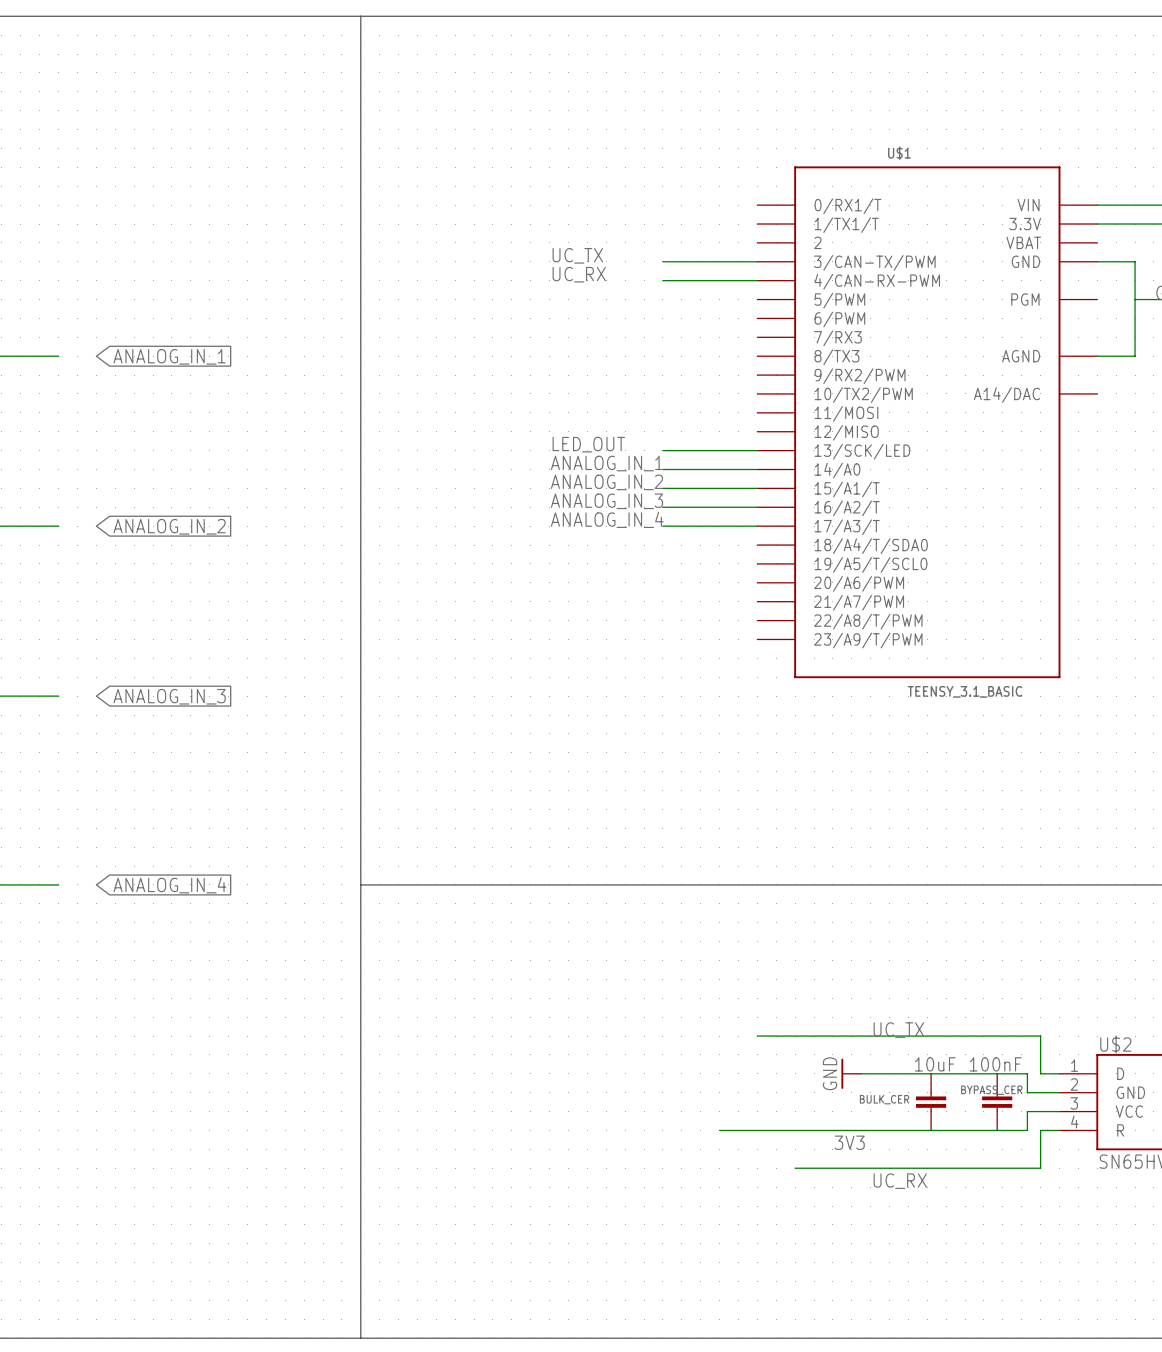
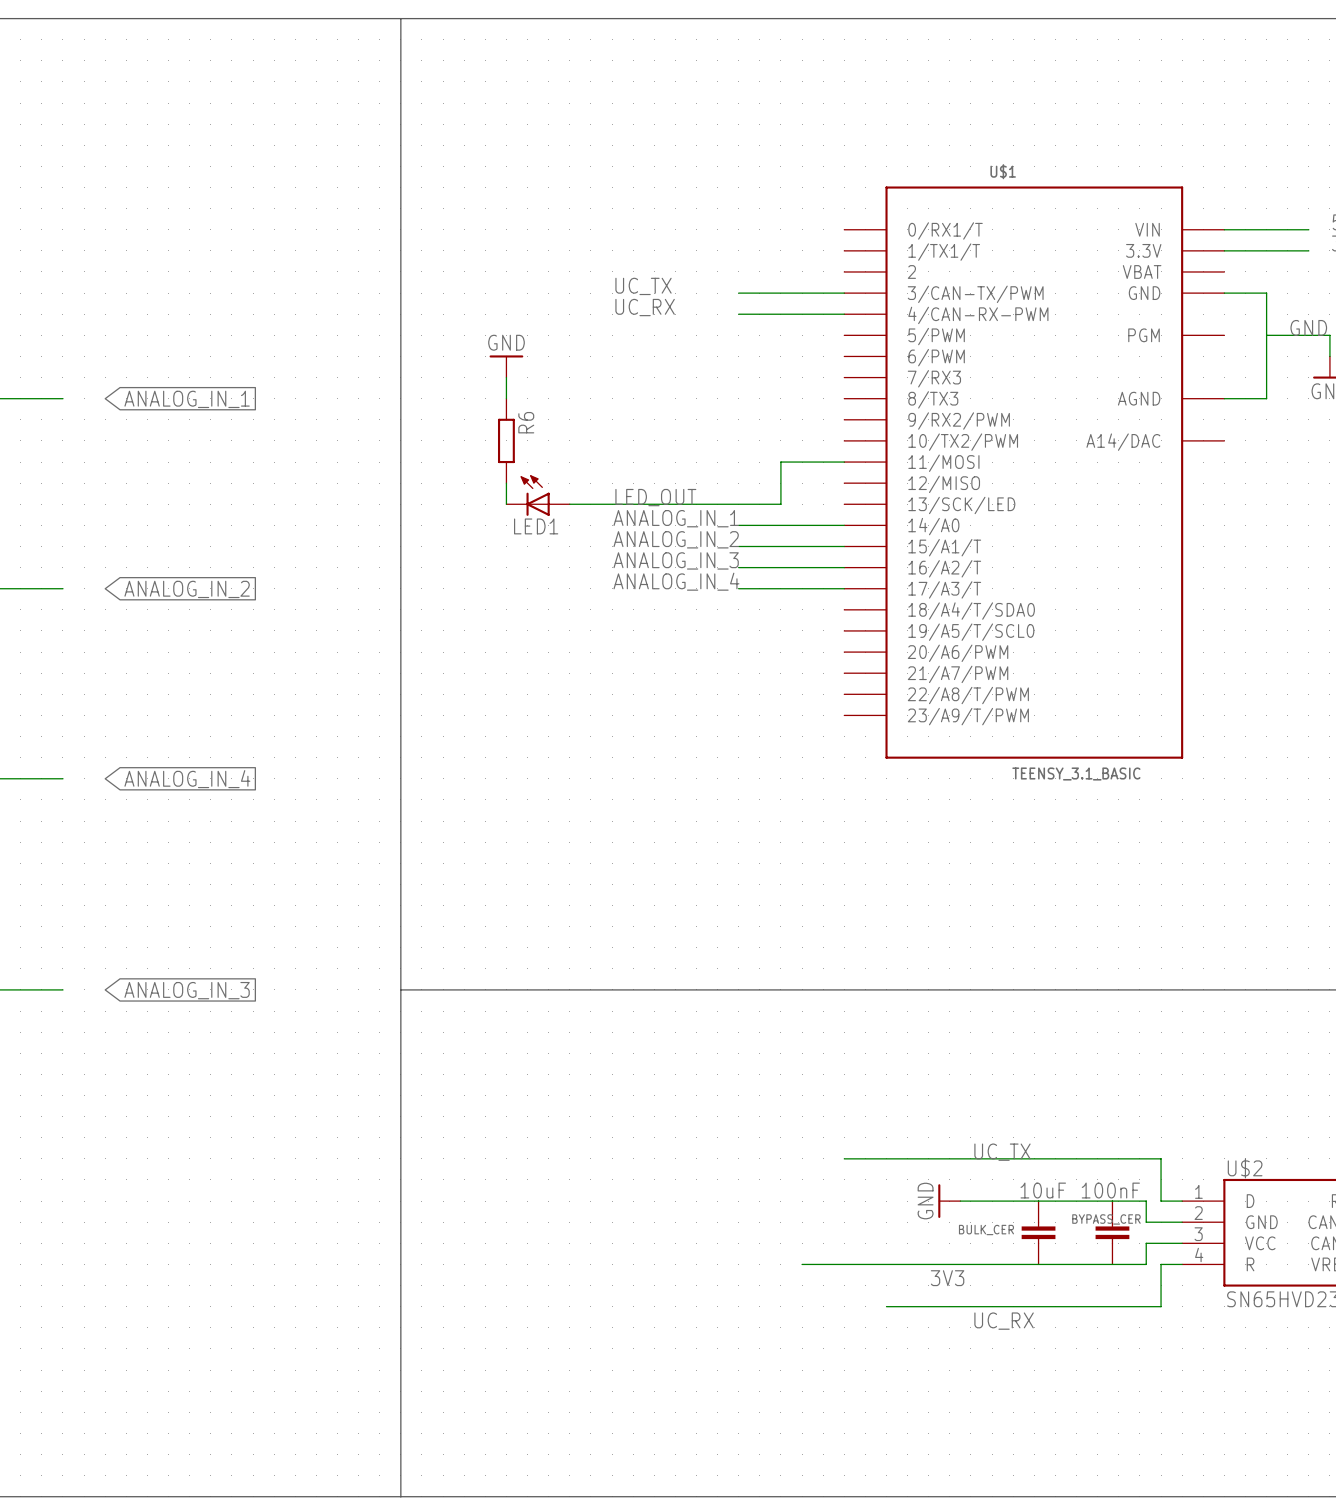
power symbol: none -> GND (506, 366)
wire: none -> (506, 377) (506, 398)
R6: none -> (506, 440)
wire: none -> (506, 483) (506, 504)
LED1: none -> (538, 495)
wire: none -> (569, 504) (738, 504)
wire: (700, 450) (757, 450) -> (780, 504) (780, 462) (844, 462)
global label: ANALOG_IN_3 (169, 696) -> ANALOG_IN_4 (187, 779)
global label: ANALOG_IN_4 (169, 885) -> ANALOG_IN_3 (187, 990)

